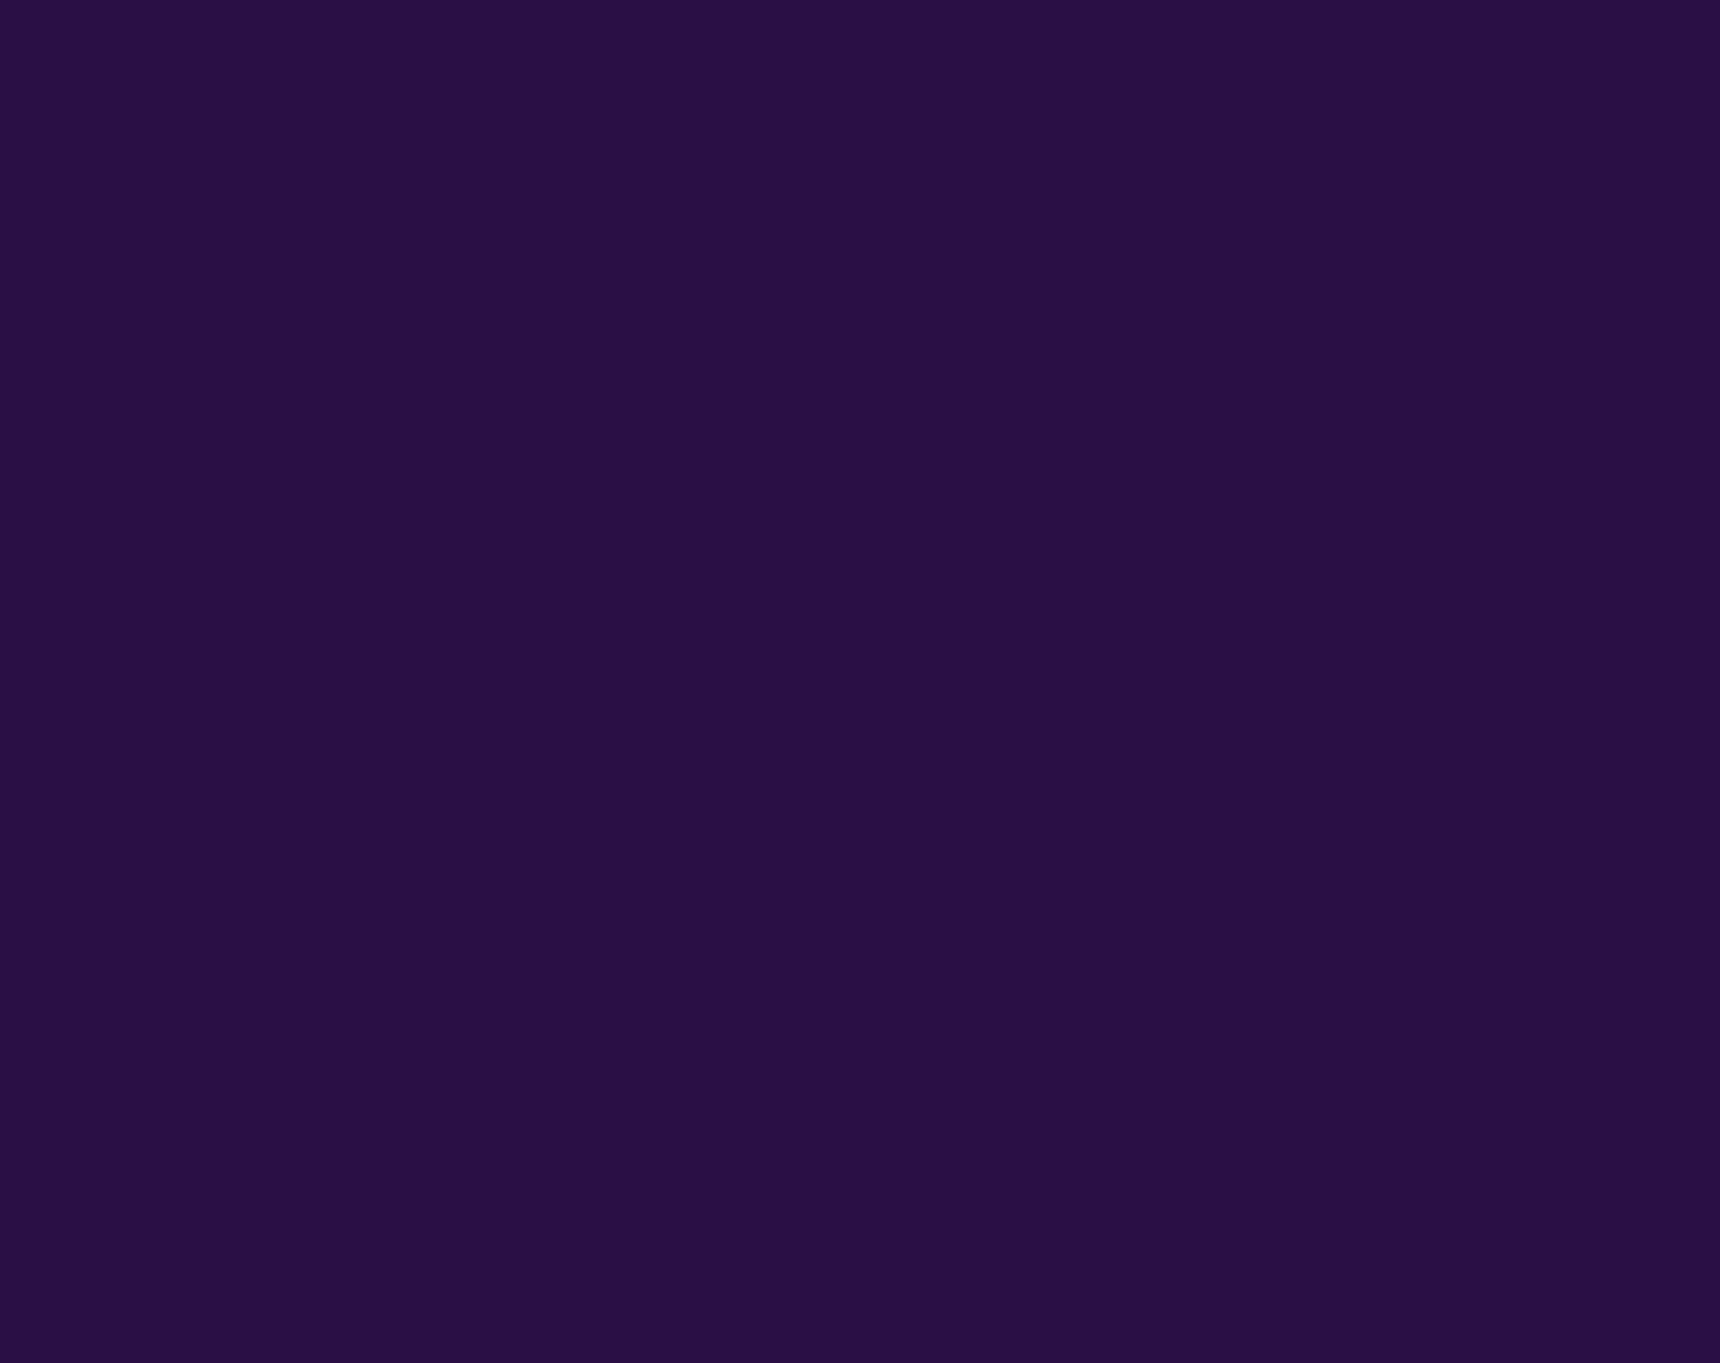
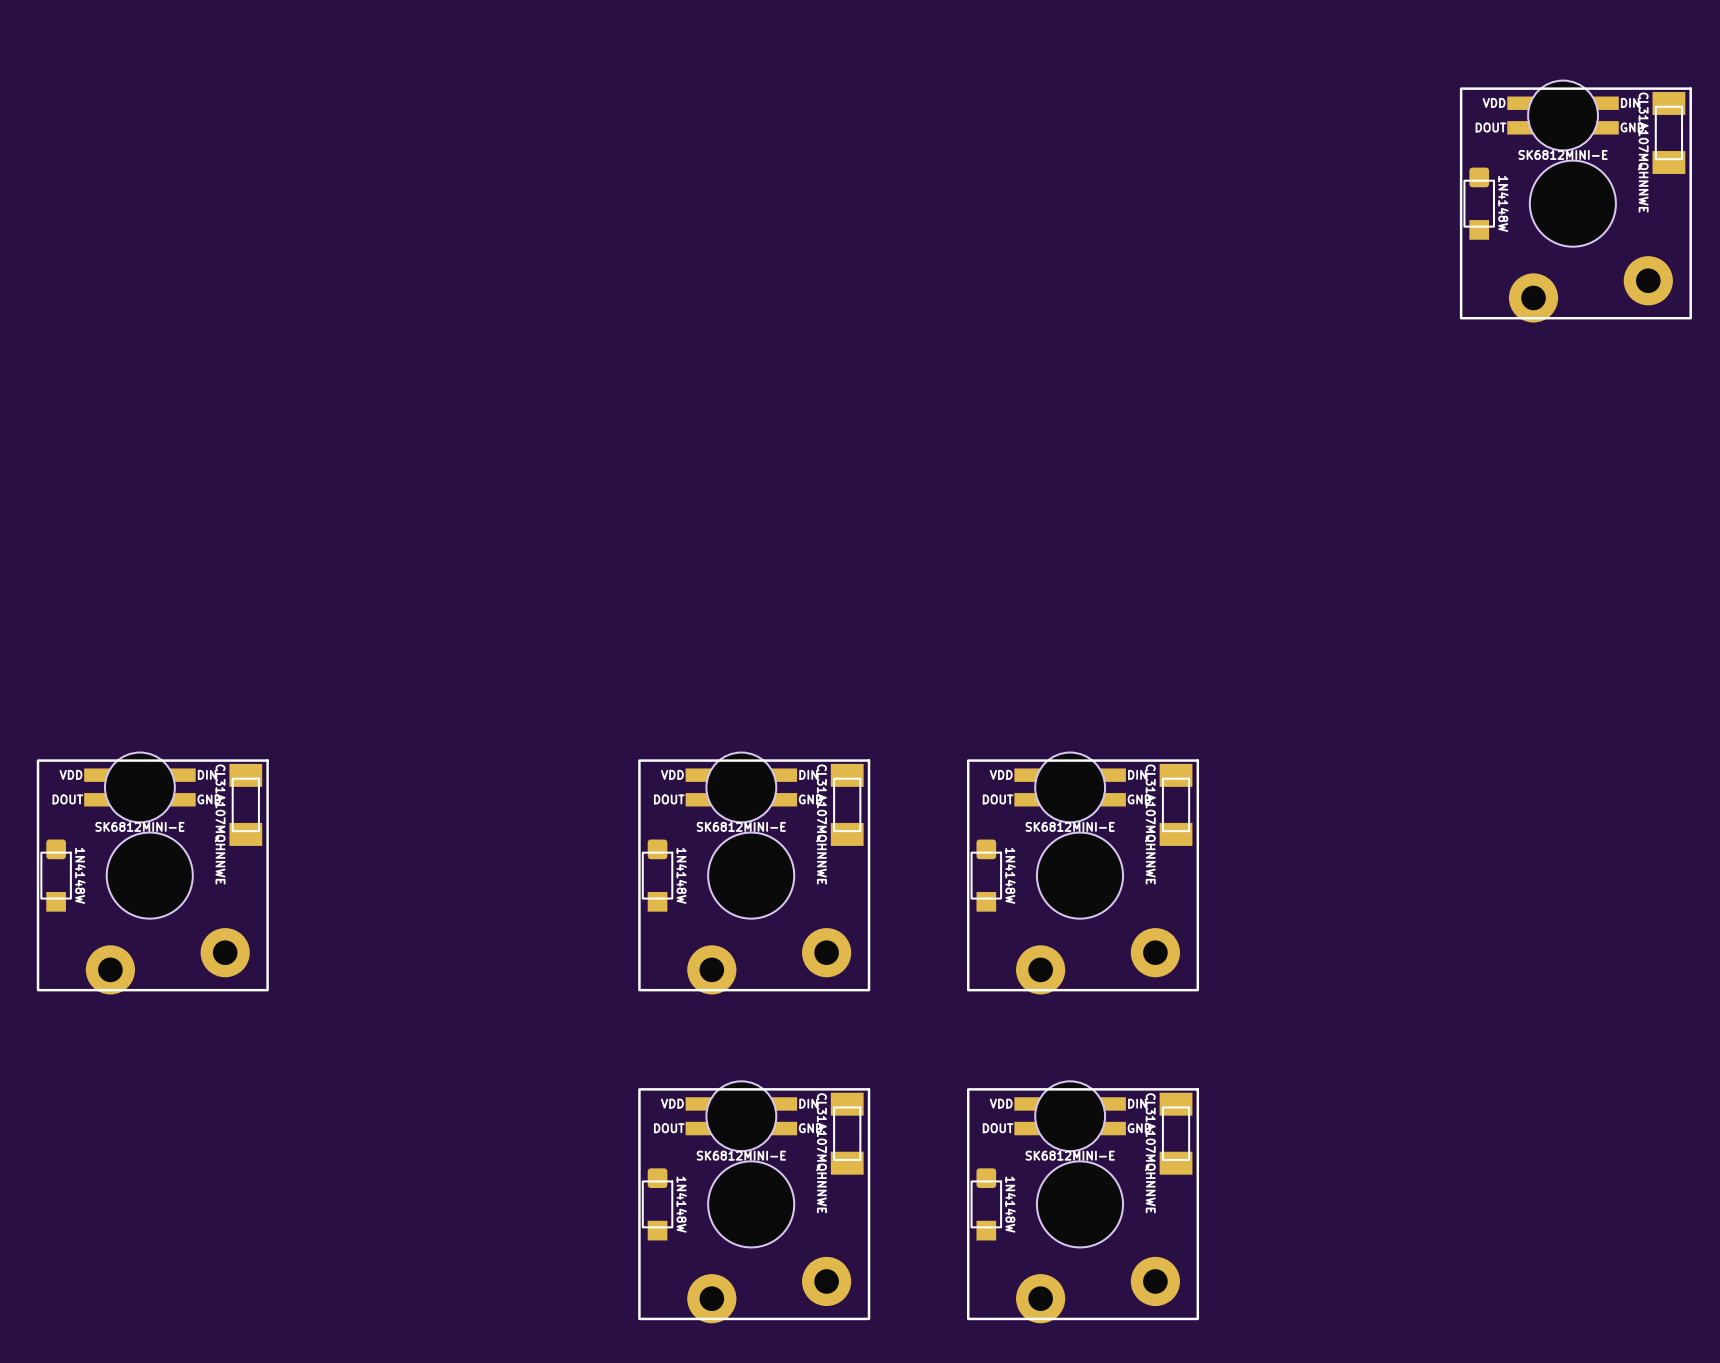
part: none -> (1575, 201)
part: none -> (152, 873)
part: none -> (754, 873)
part: none -> (1083, 873)
part: none -> (754, 1202)
part: none -> (1083, 1202)

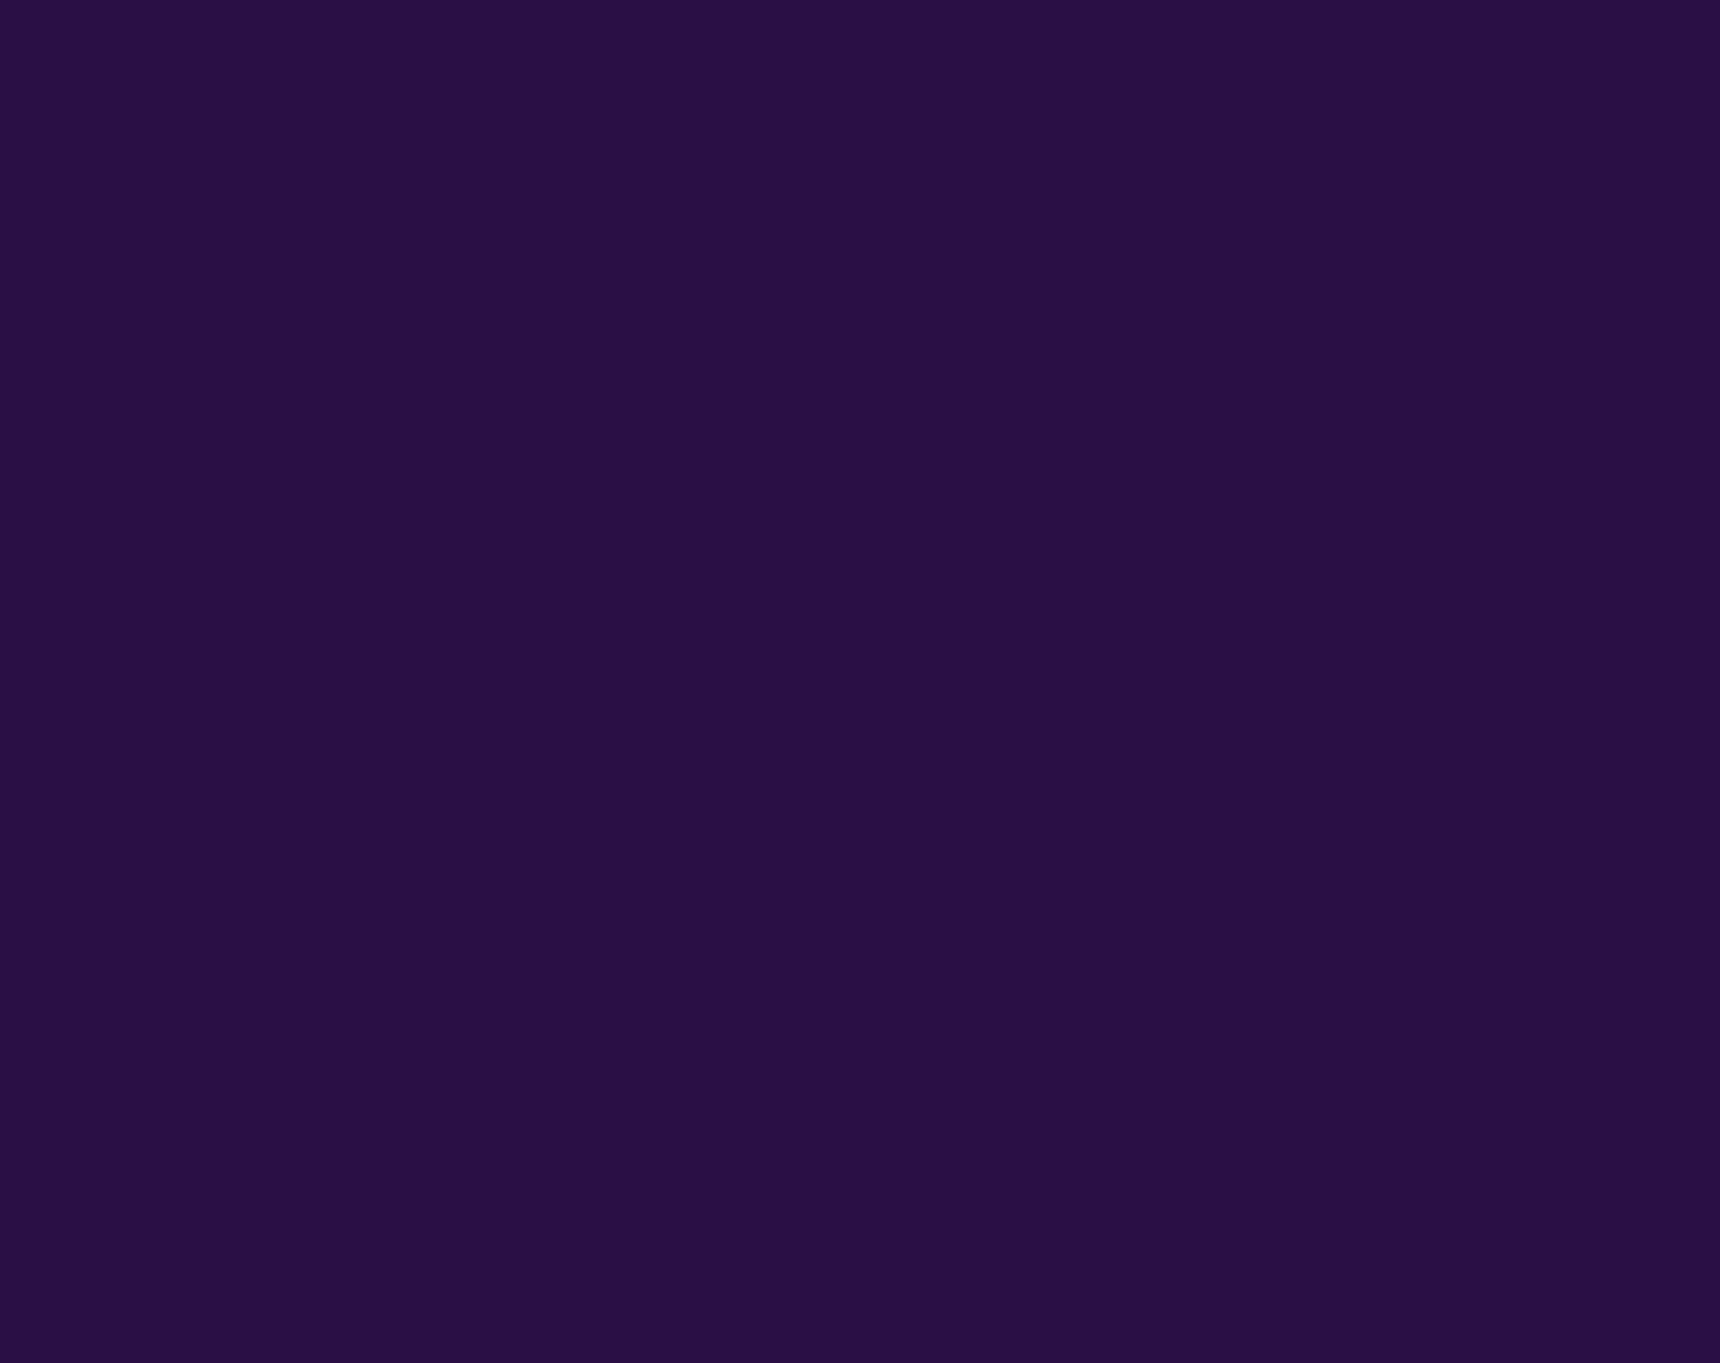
part: (1575, 201) -> none
part: (152, 873) -> none
part: (754, 873) -> none
part: (1083, 873) -> none
part: (754, 1202) -> none
part: (1083, 1202) -> none

